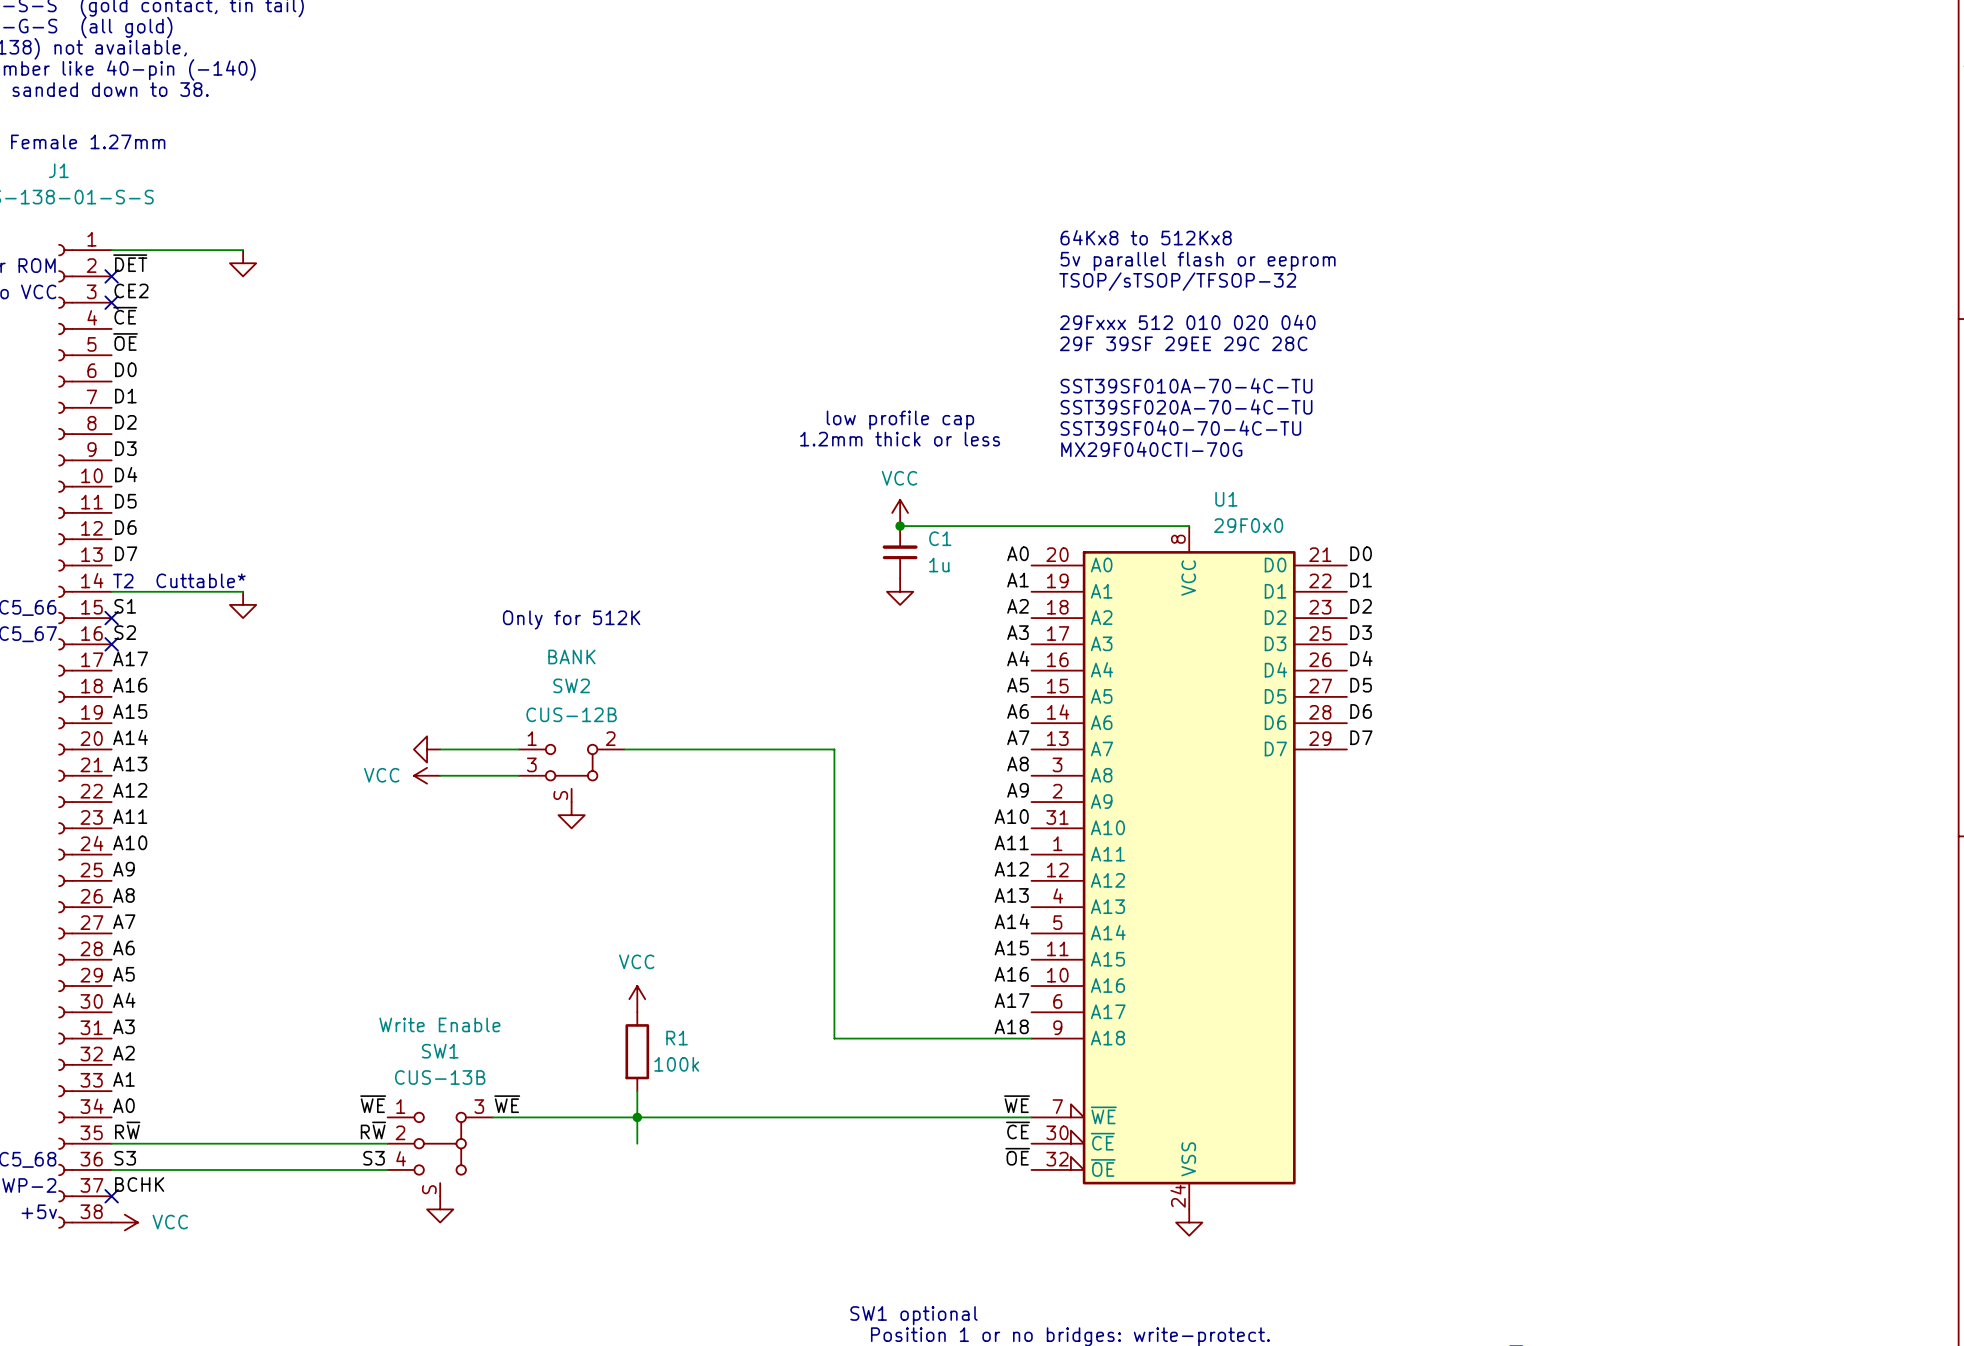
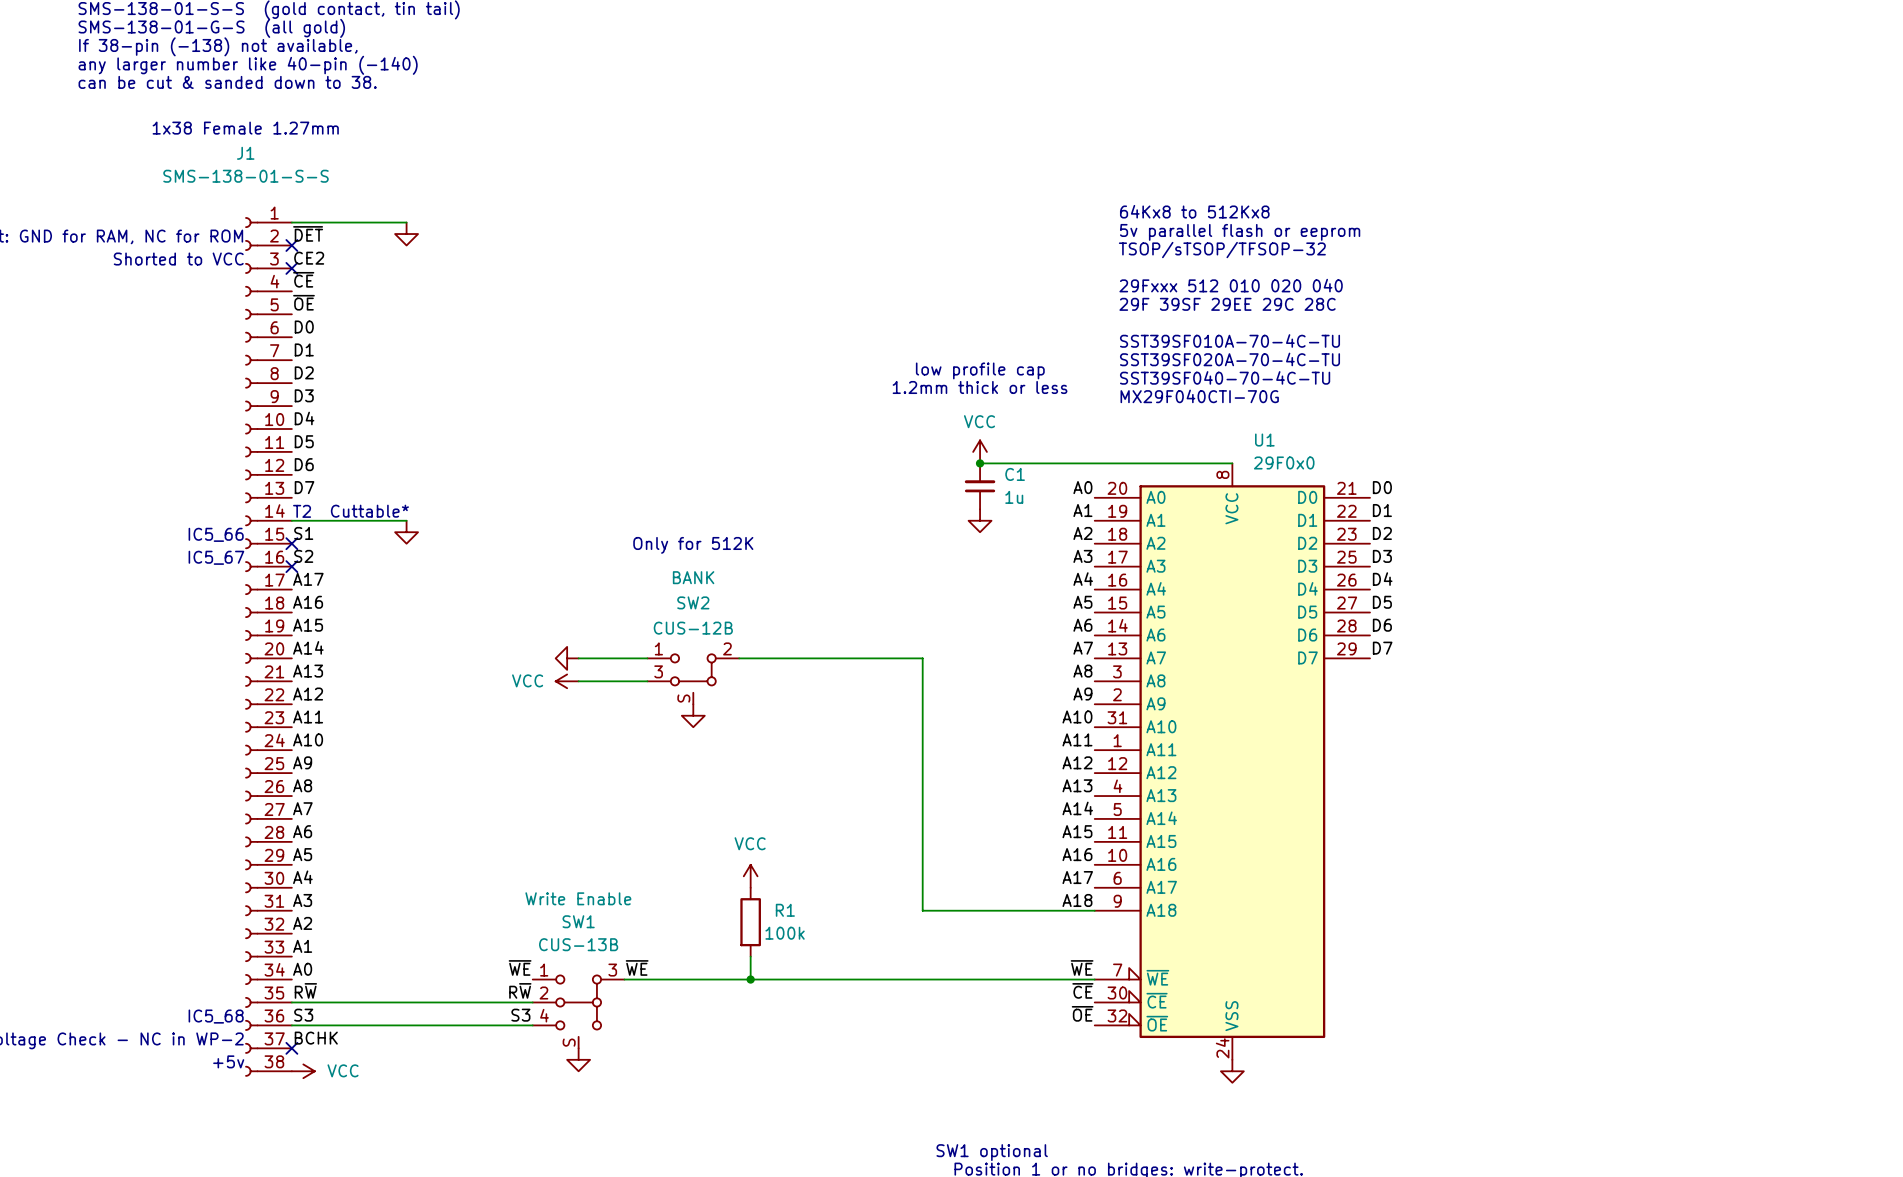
wire: (637, 1117) (637, 1143) -> none

